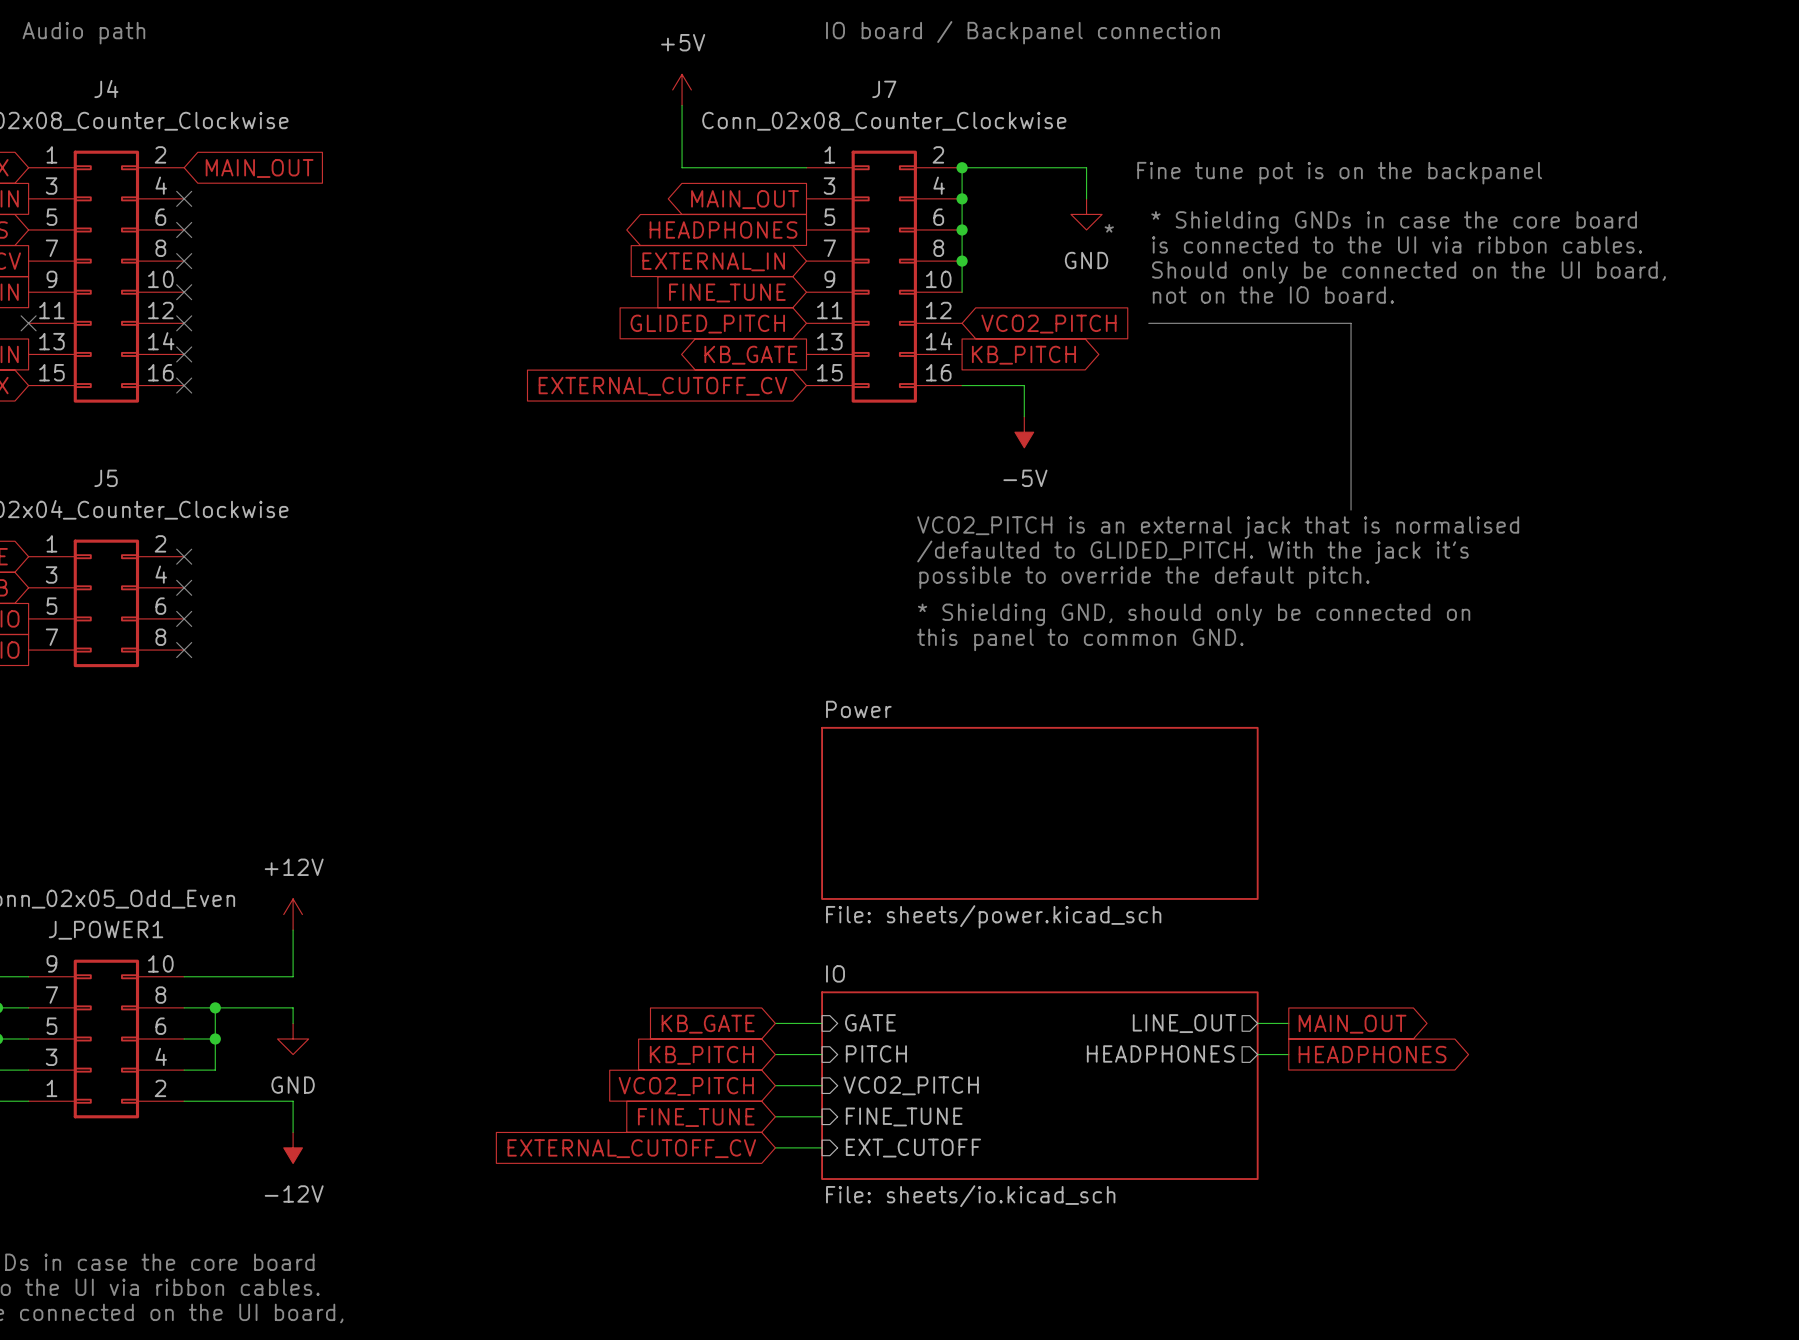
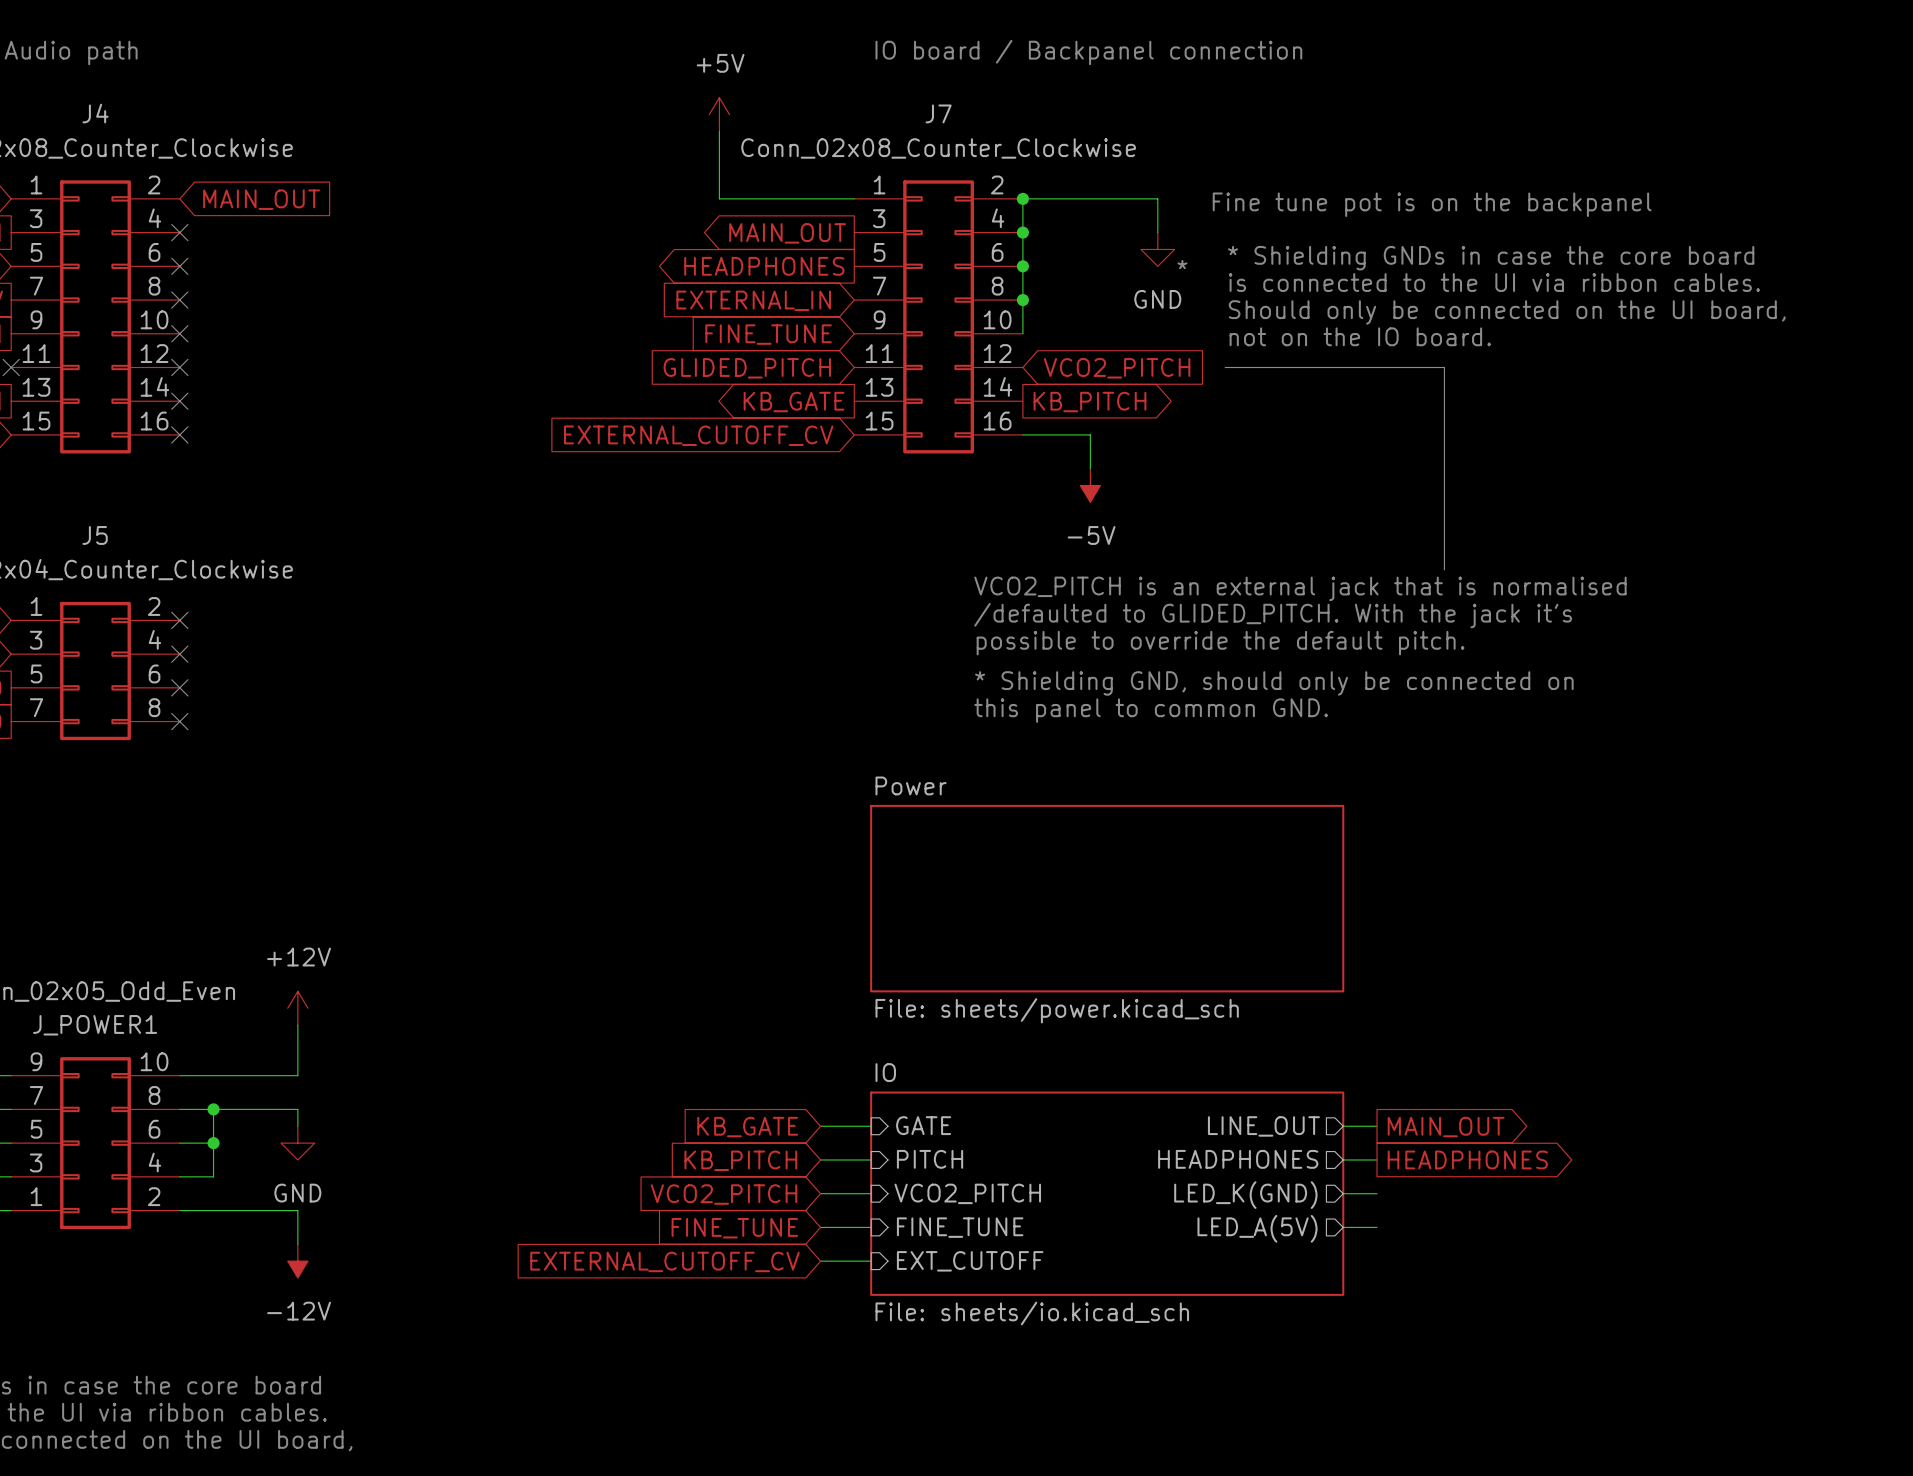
wire: none -> (1343, 1193) (1377, 1193)
sheet pin: none -> LED_K(GND) (1245, 1195)
wire: none -> (1343, 1227) (1377, 1227)
sheet pin: none -> LED_A(5V) (1257, 1228)

